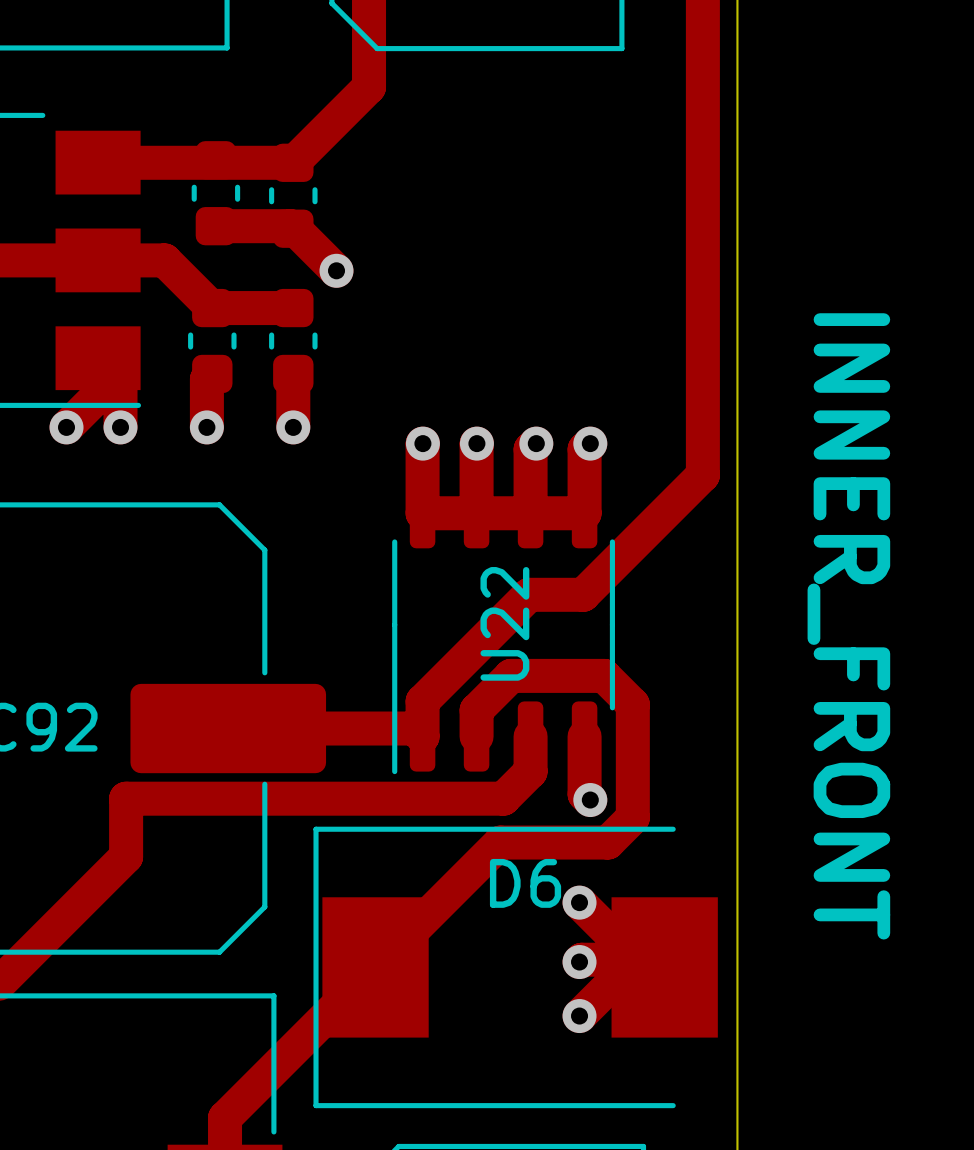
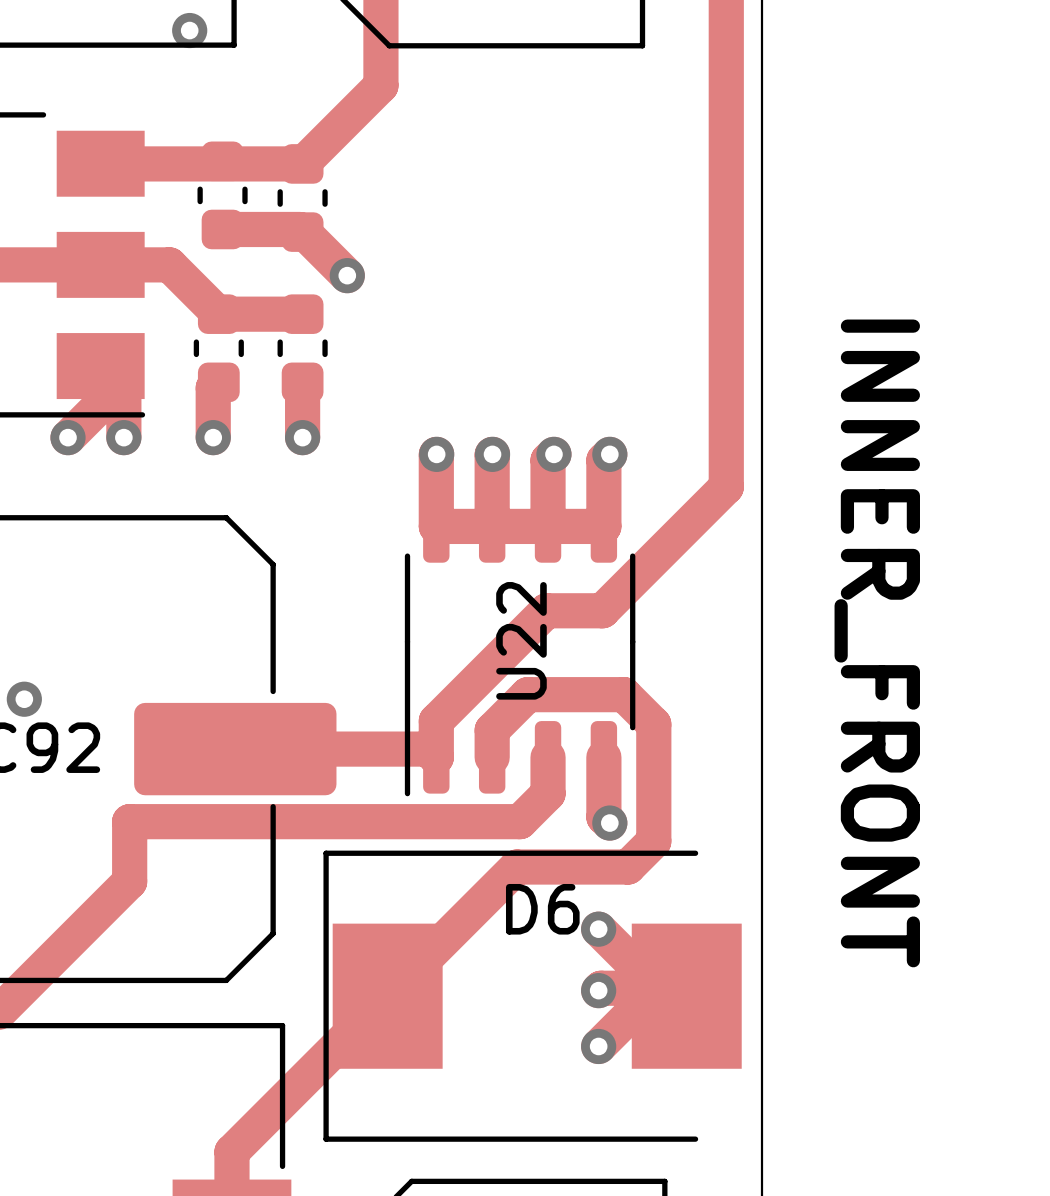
via: none -> (189, 30)
via: none -> (24, 699)

